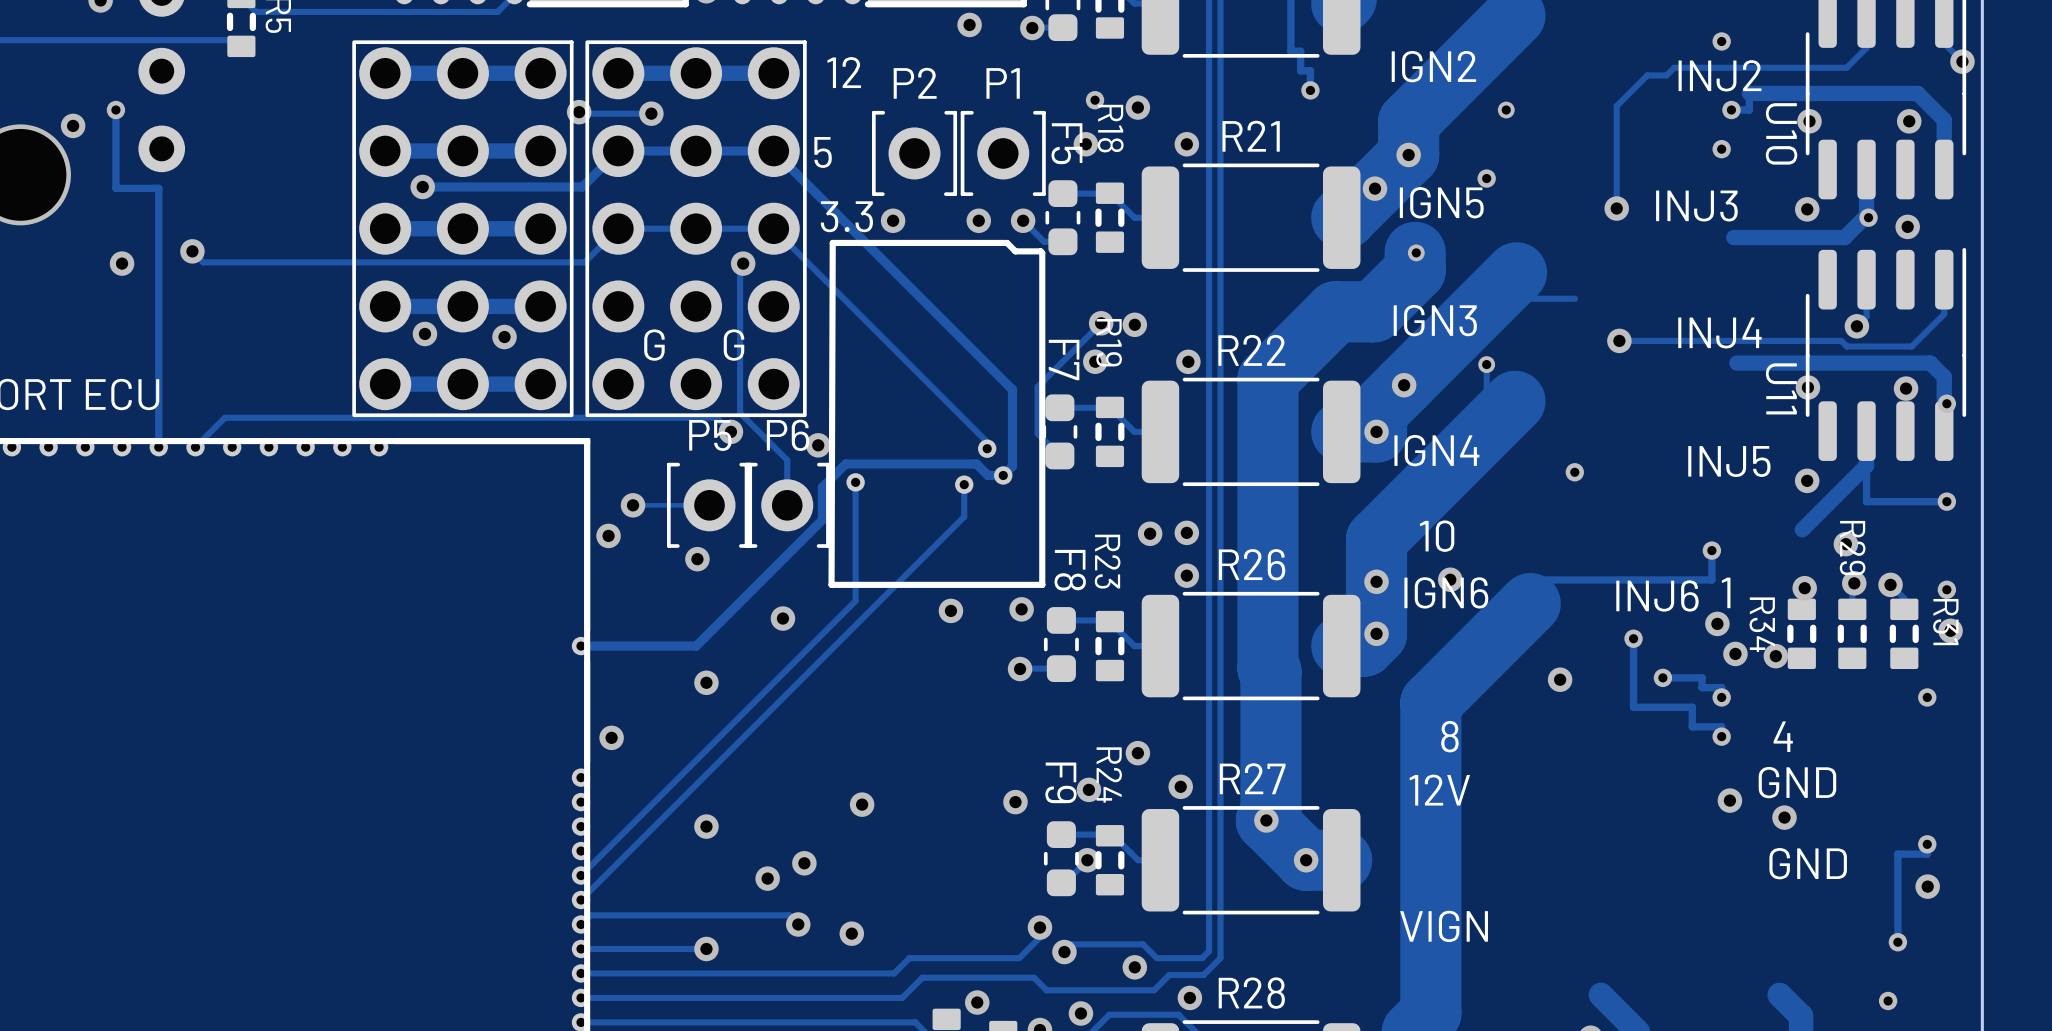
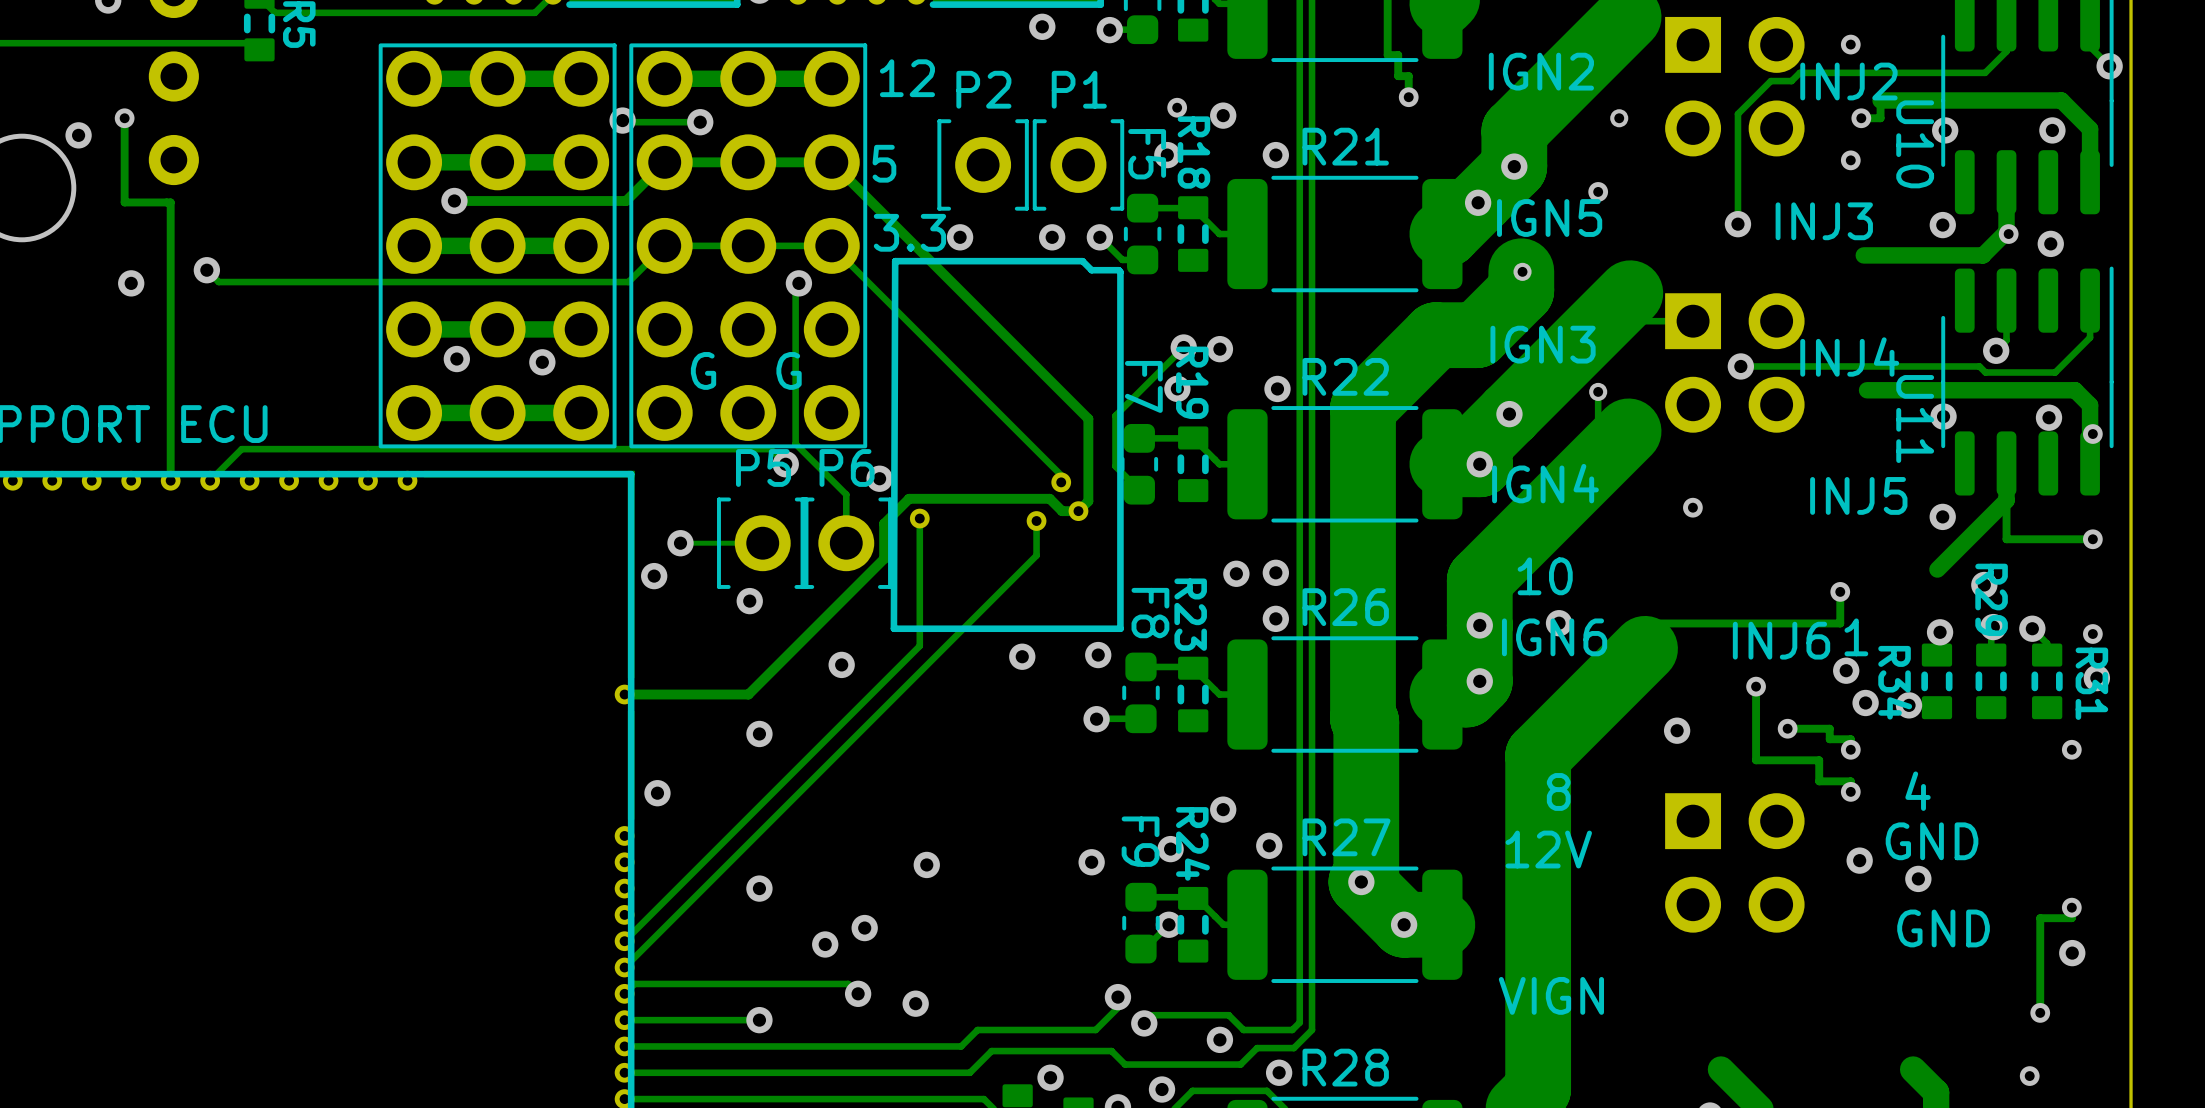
part: none -> (1734, 86)
part: none -> (1734, 362)
part: none -> (1734, 862)

